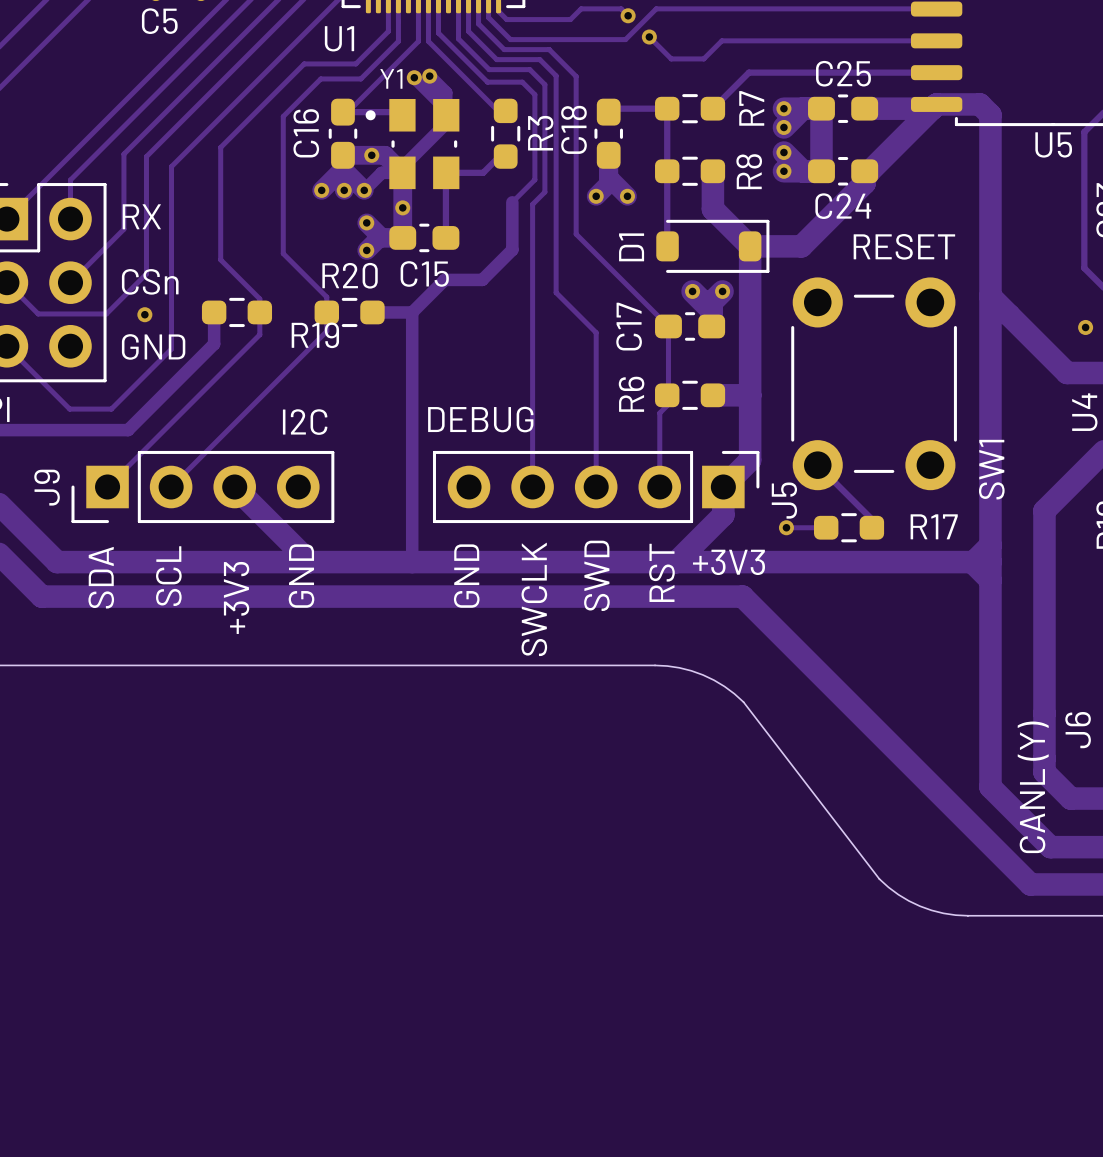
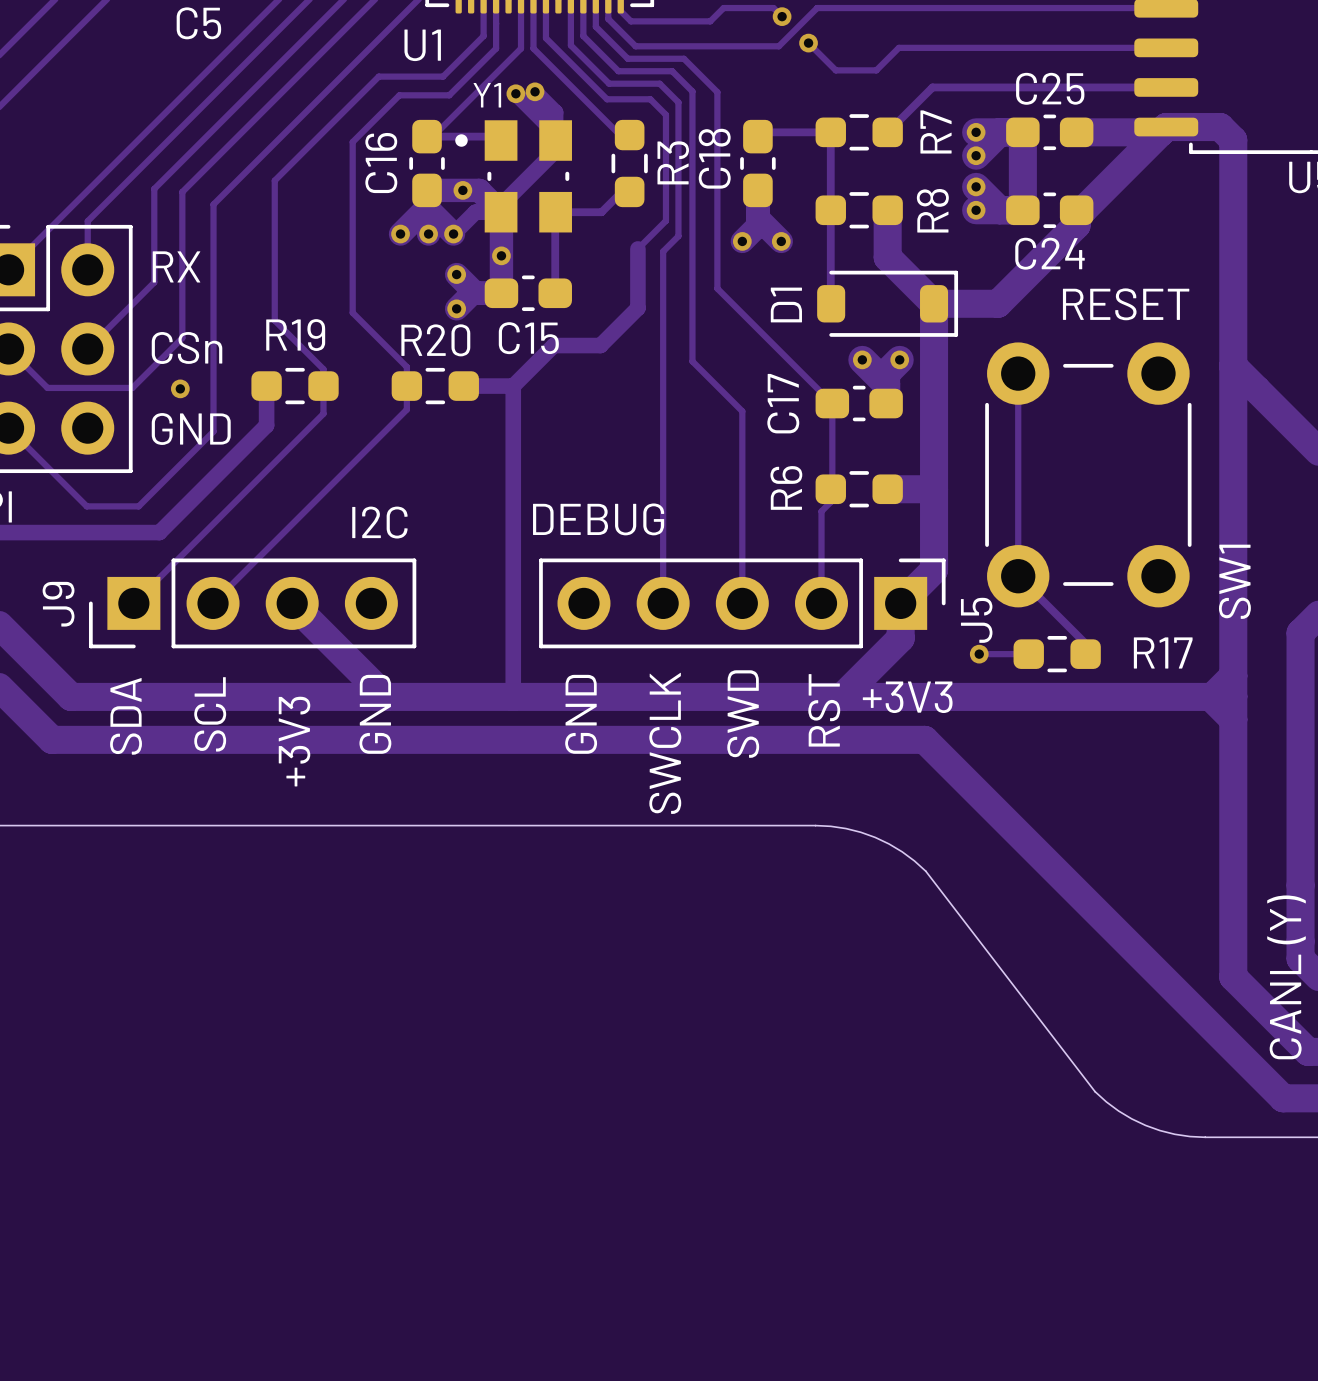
track: none -> (1018, 373) (1018, 576)
R19 name position: R19 (315, 335) -> R19 (295, 335)

